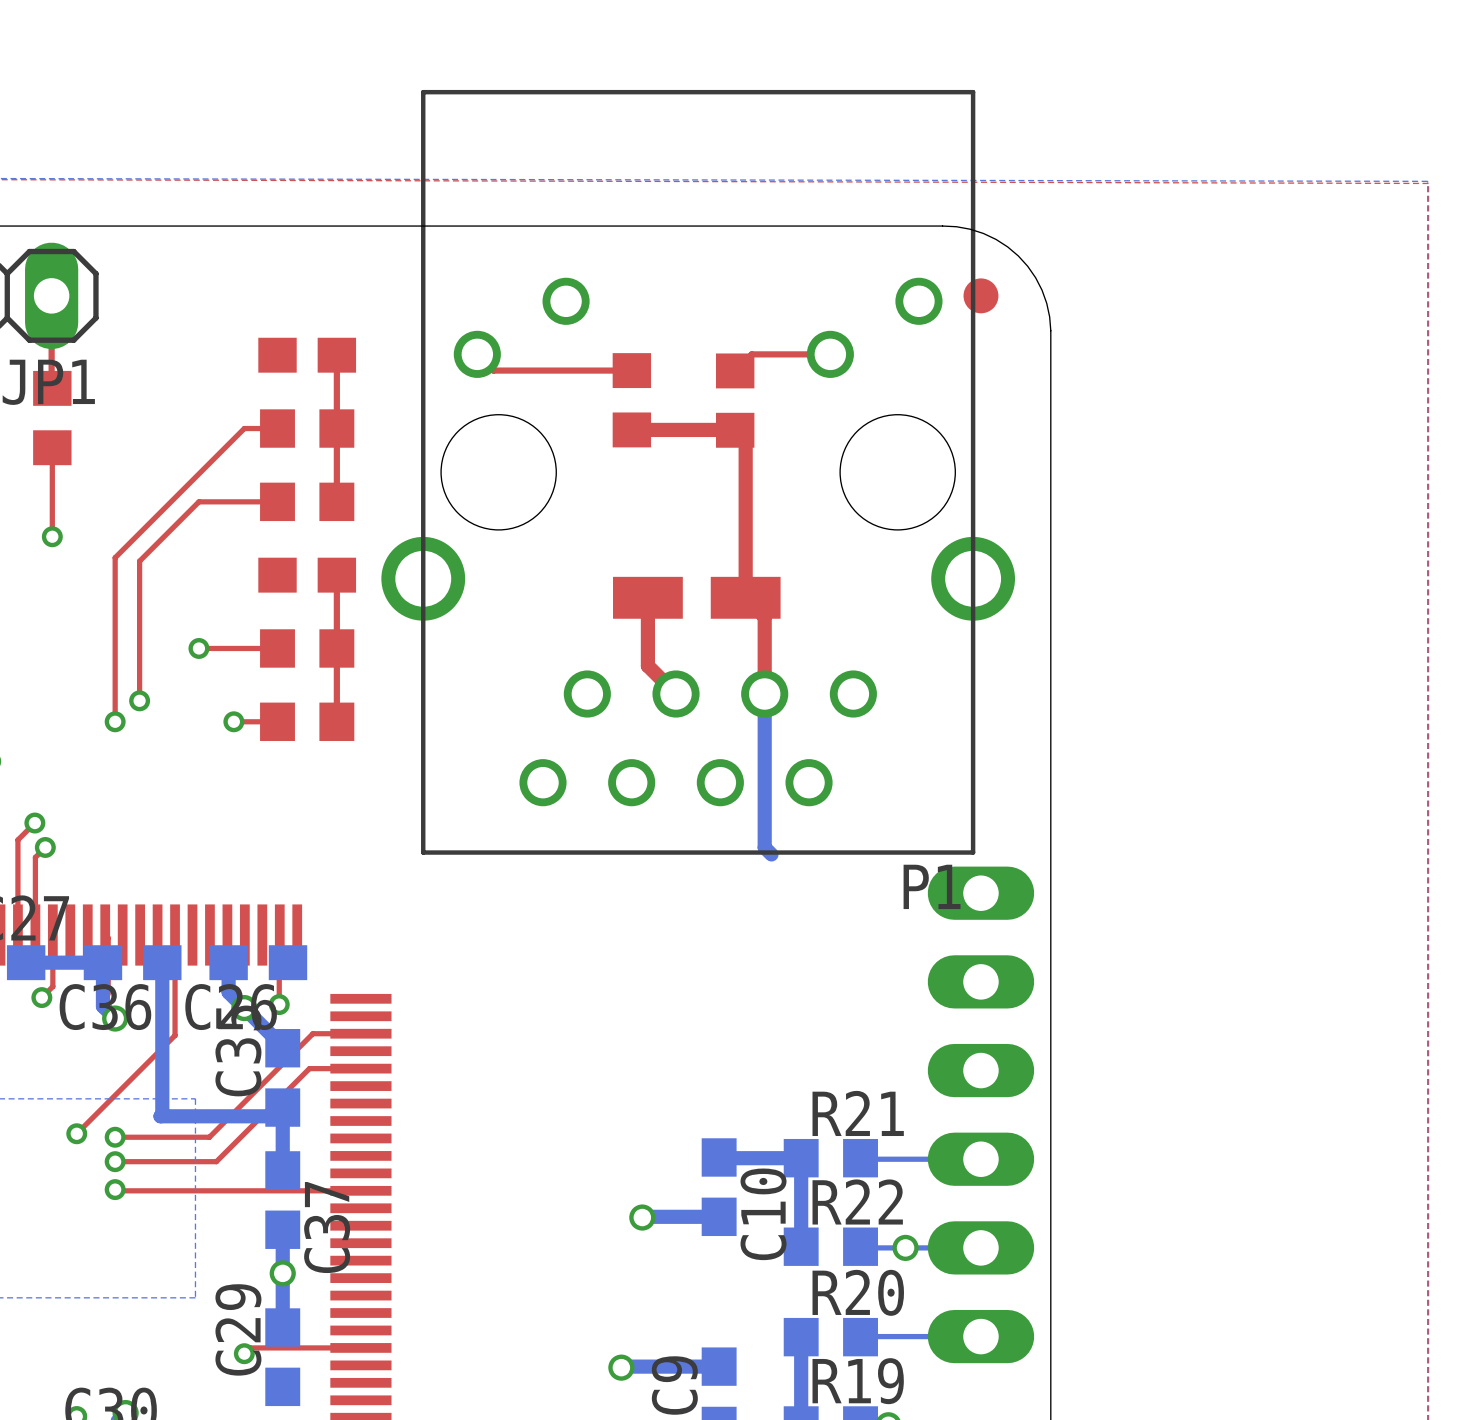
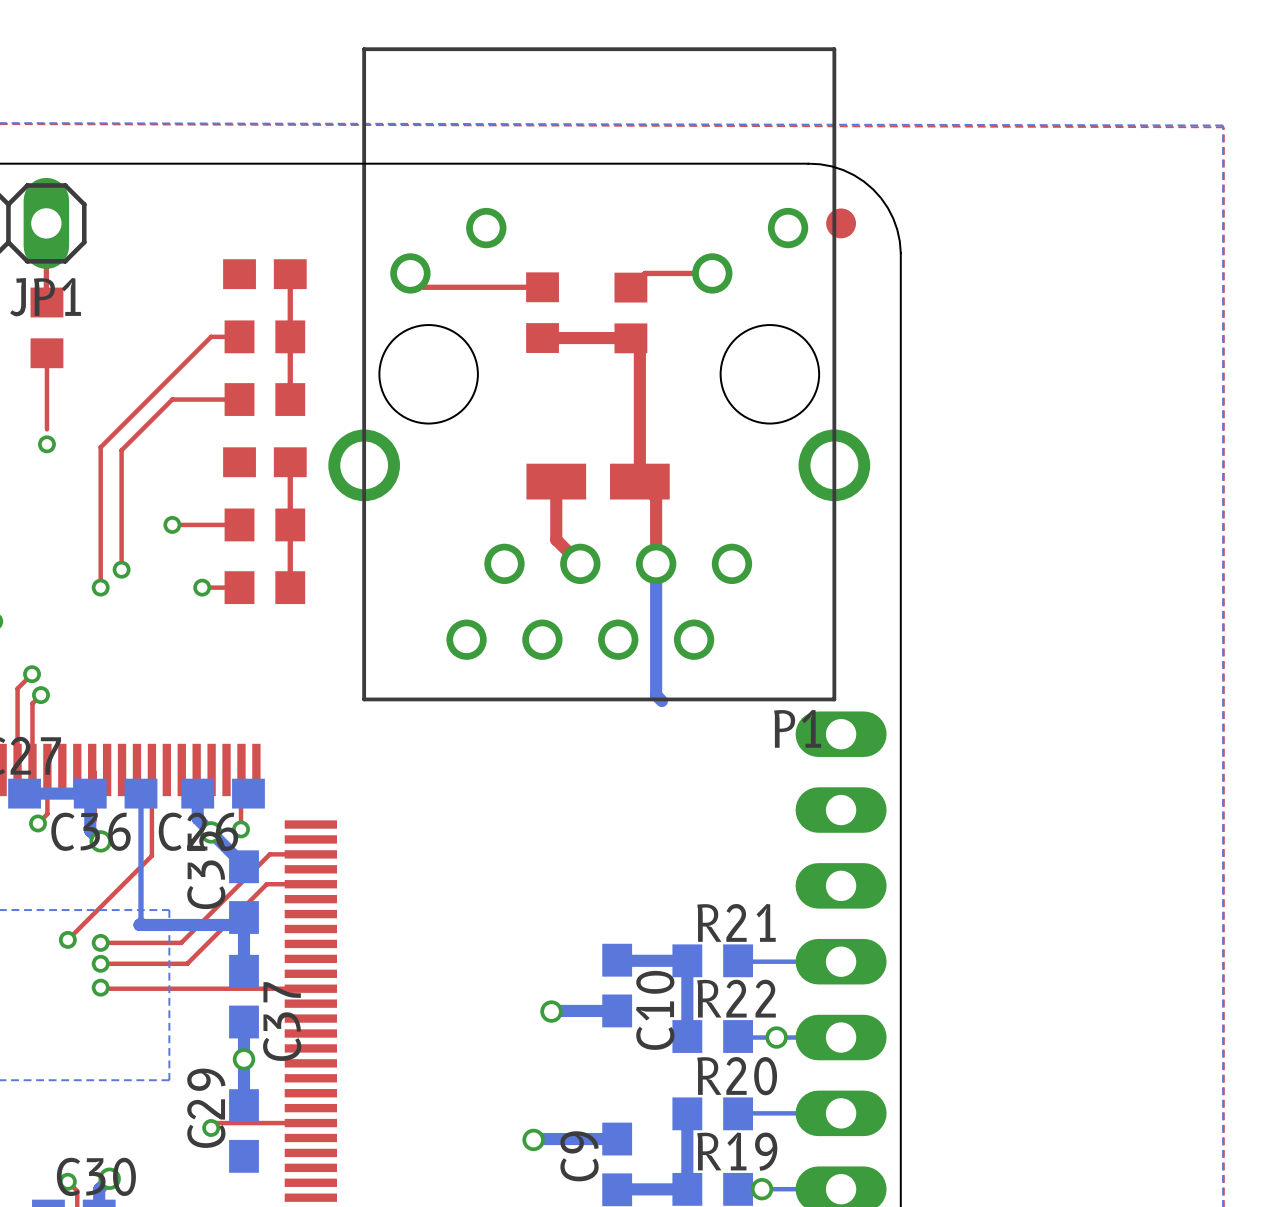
via position: (52, 536) -> (46, 444)
bottom track width: thick (162, 962) (162, 1114) -> thin (141, 793) (141, 923)

